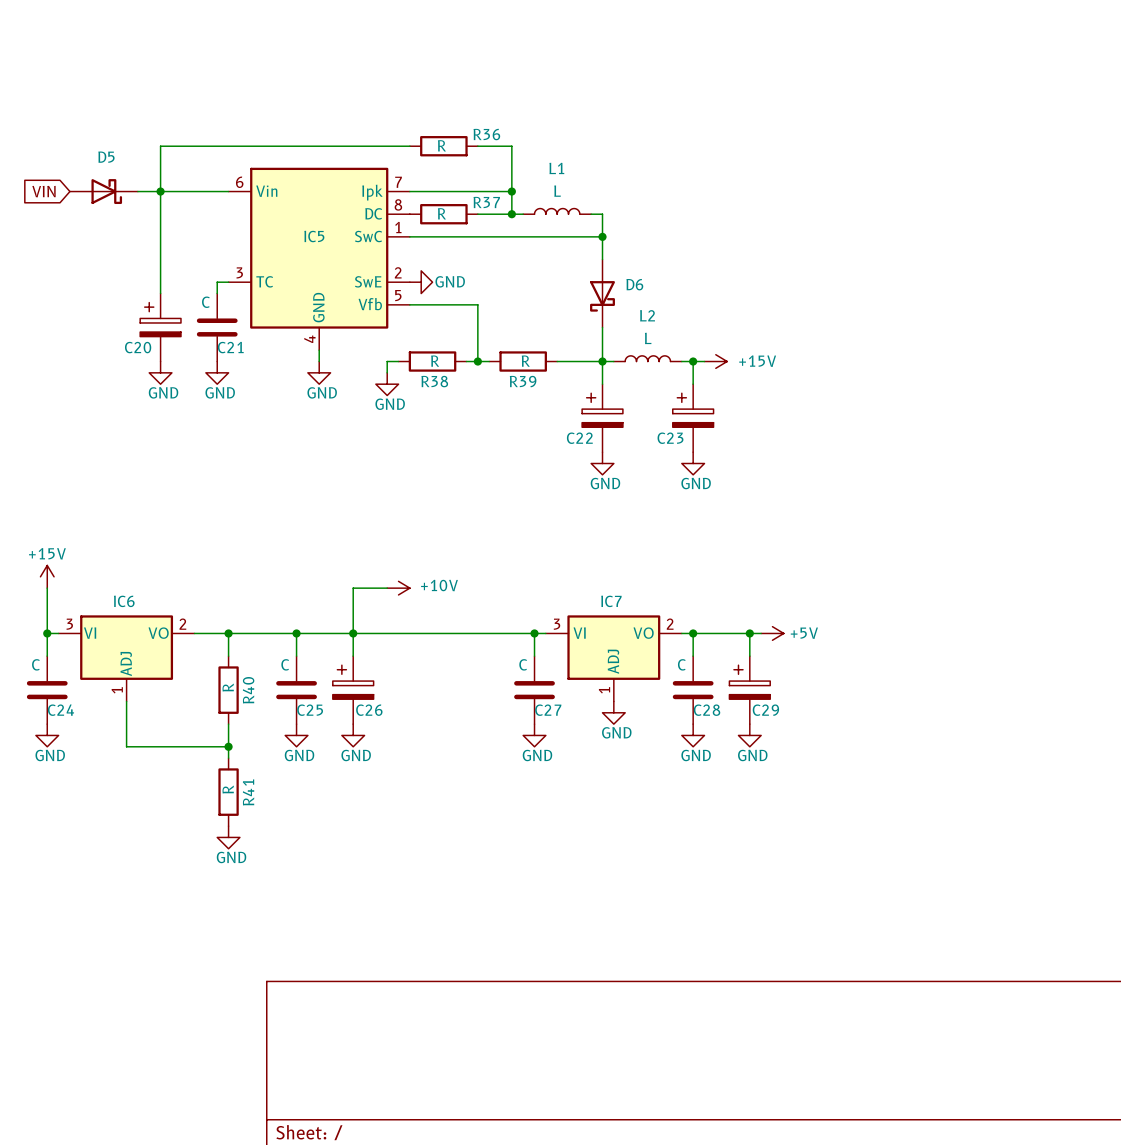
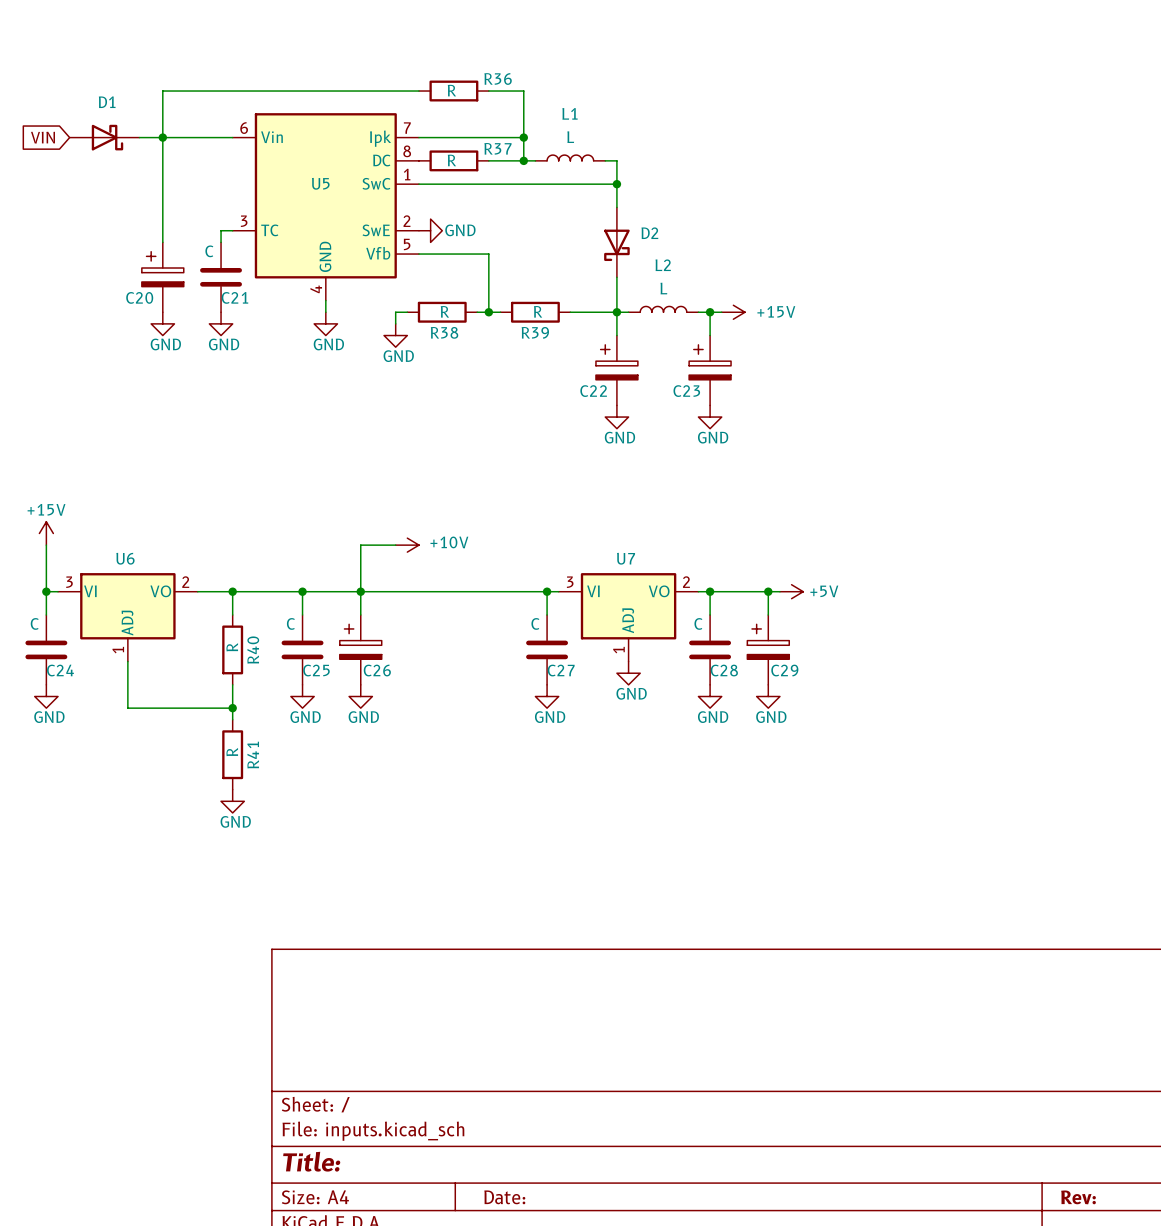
D5 name: D5 (106, 157) -> D1 (107, 102)
IC5 name: IC5 (314, 236) -> U5 (320, 183)
D6 name: D6 (634, 284) -> D2 (649, 233)
IC6 name: IC6 (124, 601) -> U6 (125, 558)
IC7 name: IC7 (611, 601) -> U7 (626, 558)

